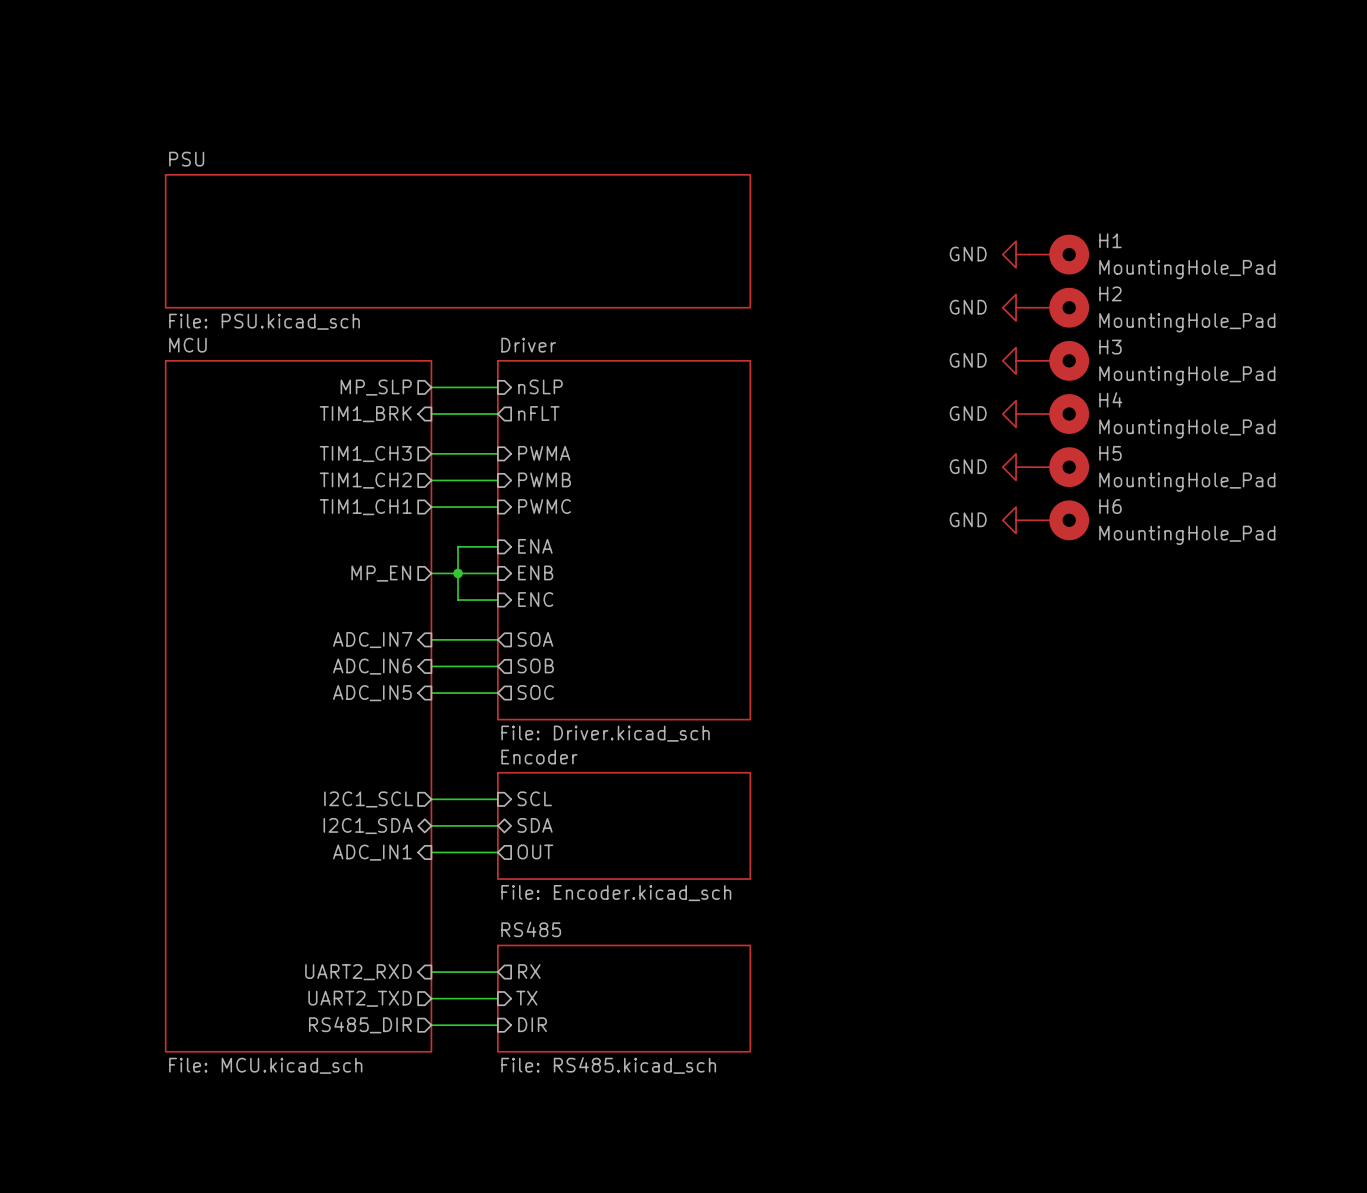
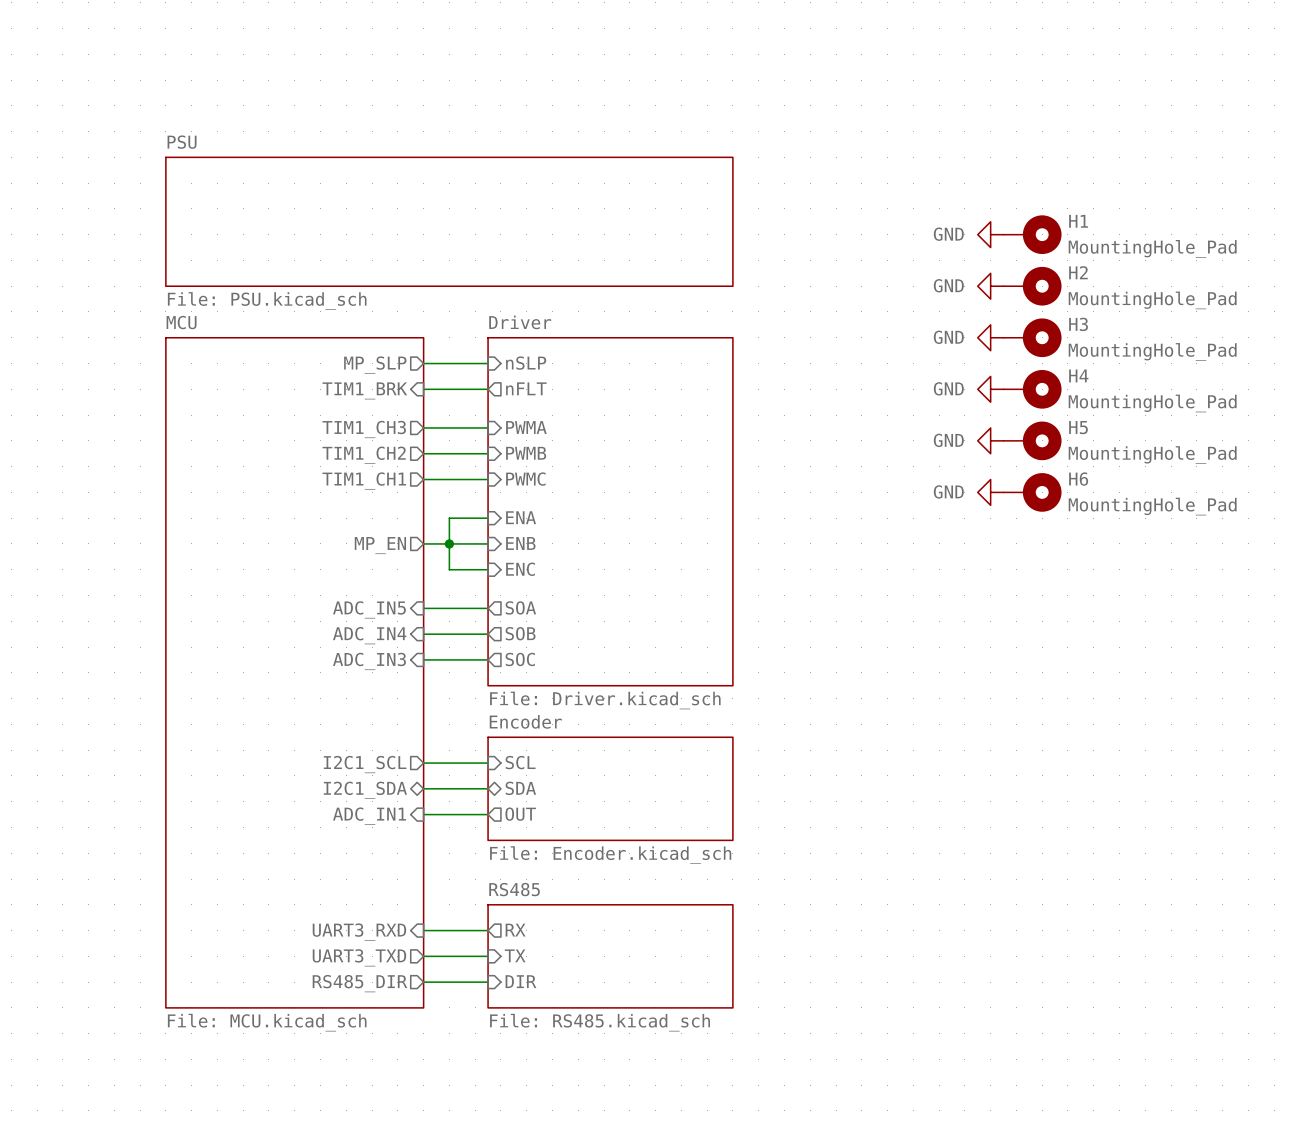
sheet pin: ADC_IN7 (372, 640) -> ADC_IN5 (369, 609)
sheet pin: ADC_IN6 (372, 666) -> ADC_IN4 (369, 635)
sheet pin: ADC_IN5 (372, 693) -> ADC_IN3 (369, 661)
sheet pin: UART2_RXD (358, 972) -> UART3_RXD (359, 932)
sheet pin: UART2_TXD (360, 998) -> UART3_TXD (359, 957)

